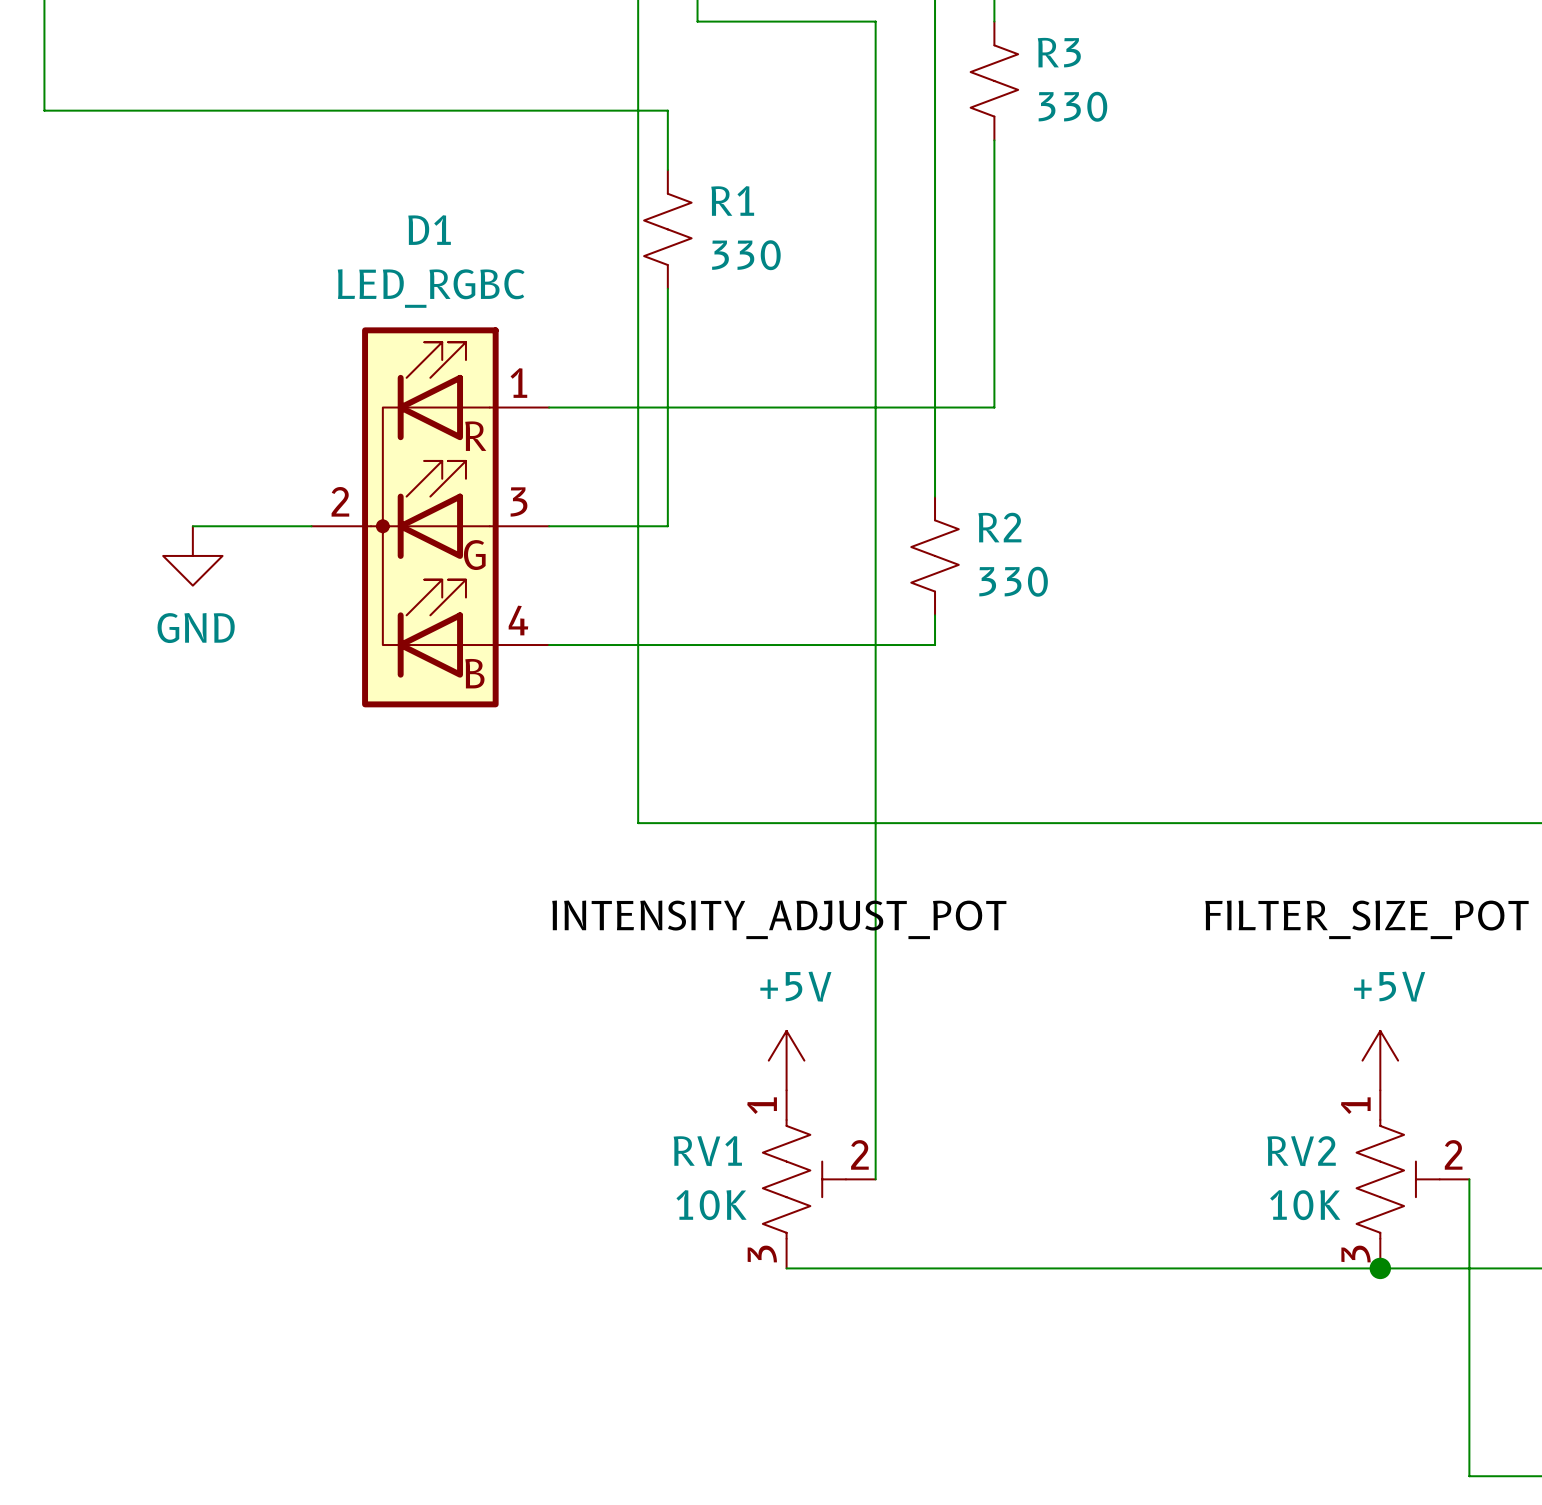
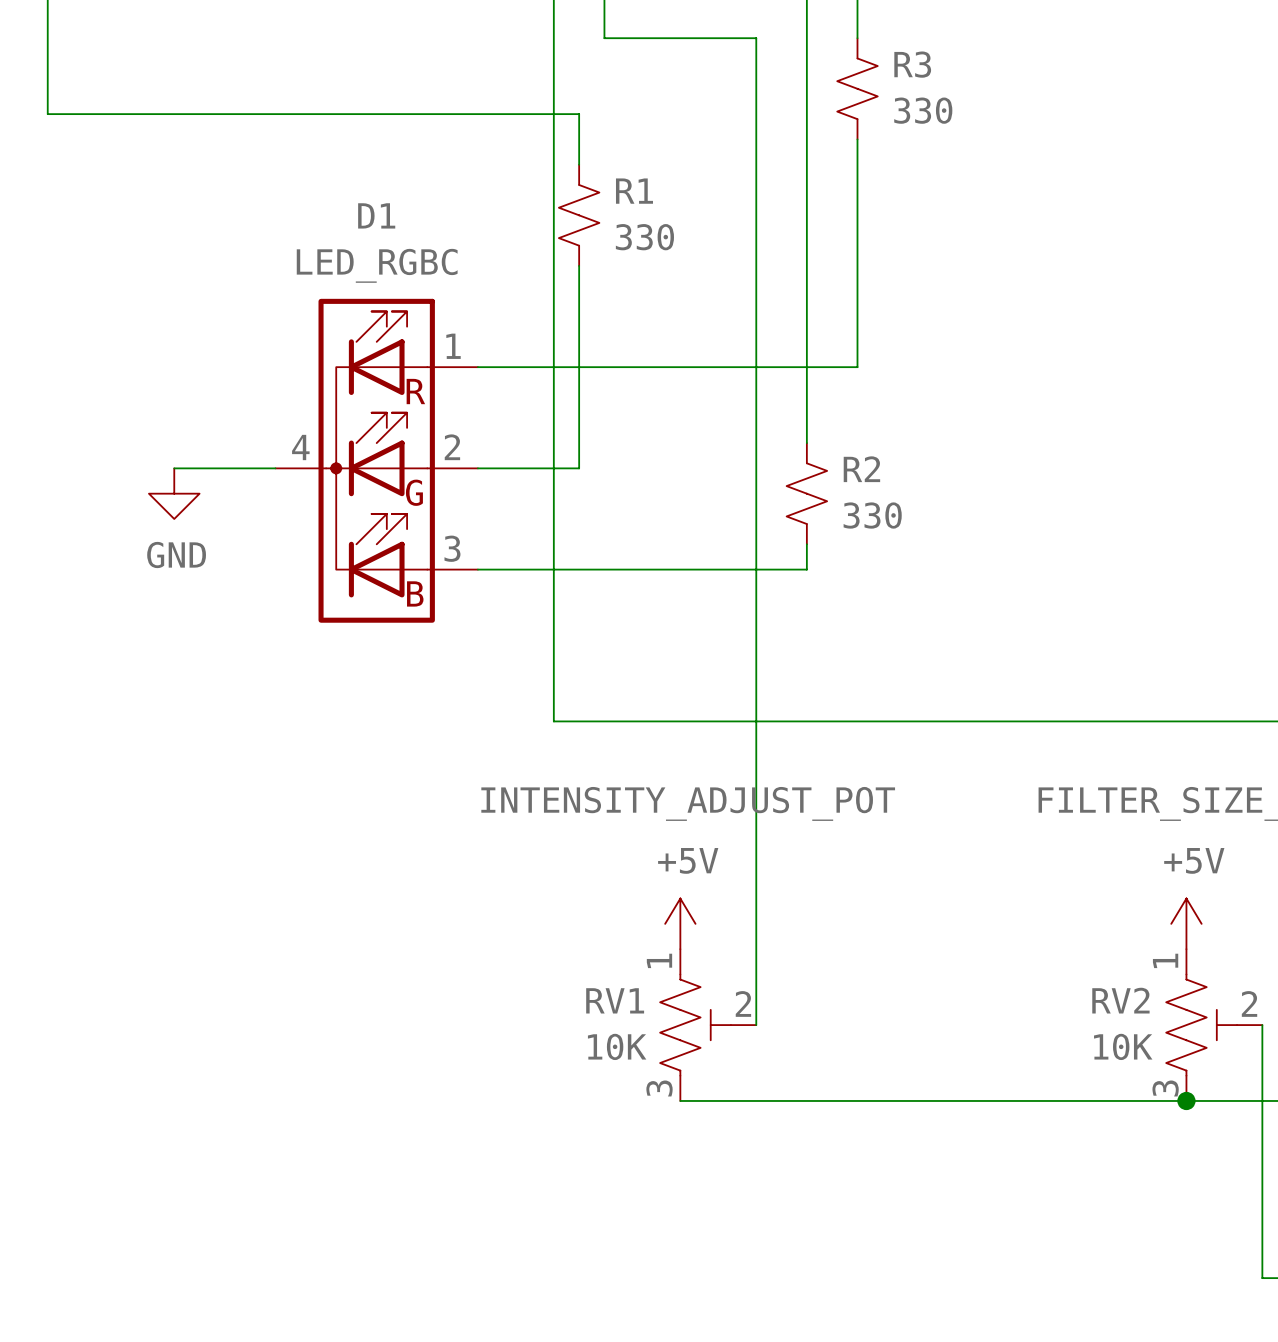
D1 pin number: 2 (340, 501) -> 4 (300, 447)
D1 pin number: 3 (519, 501) -> 2 (452, 447)
D1 pin number: 4 (518, 620) -> 3 (452, 548)

